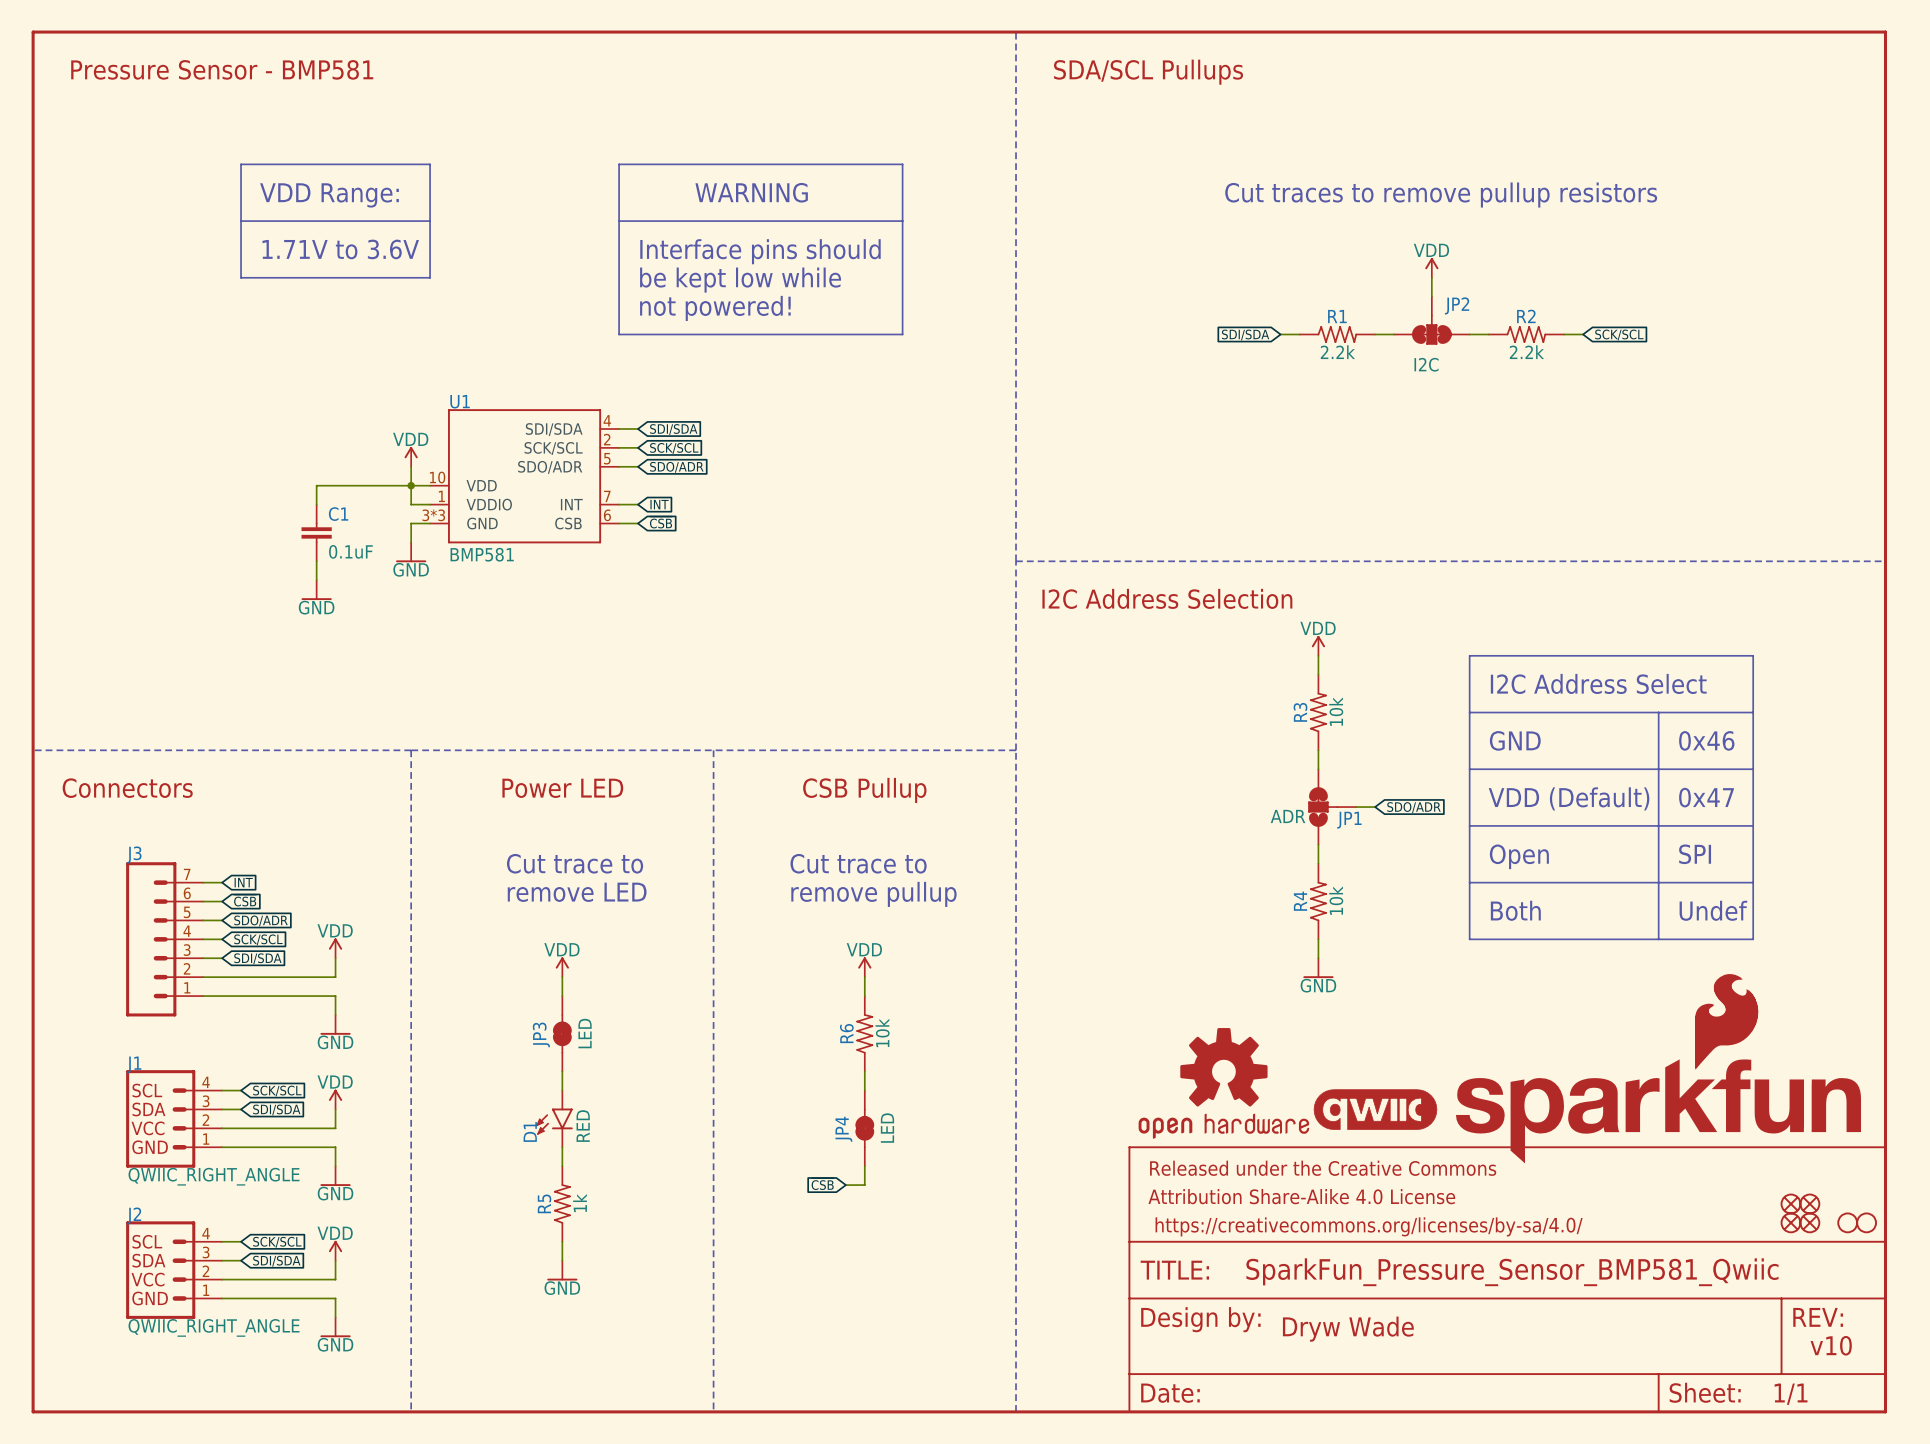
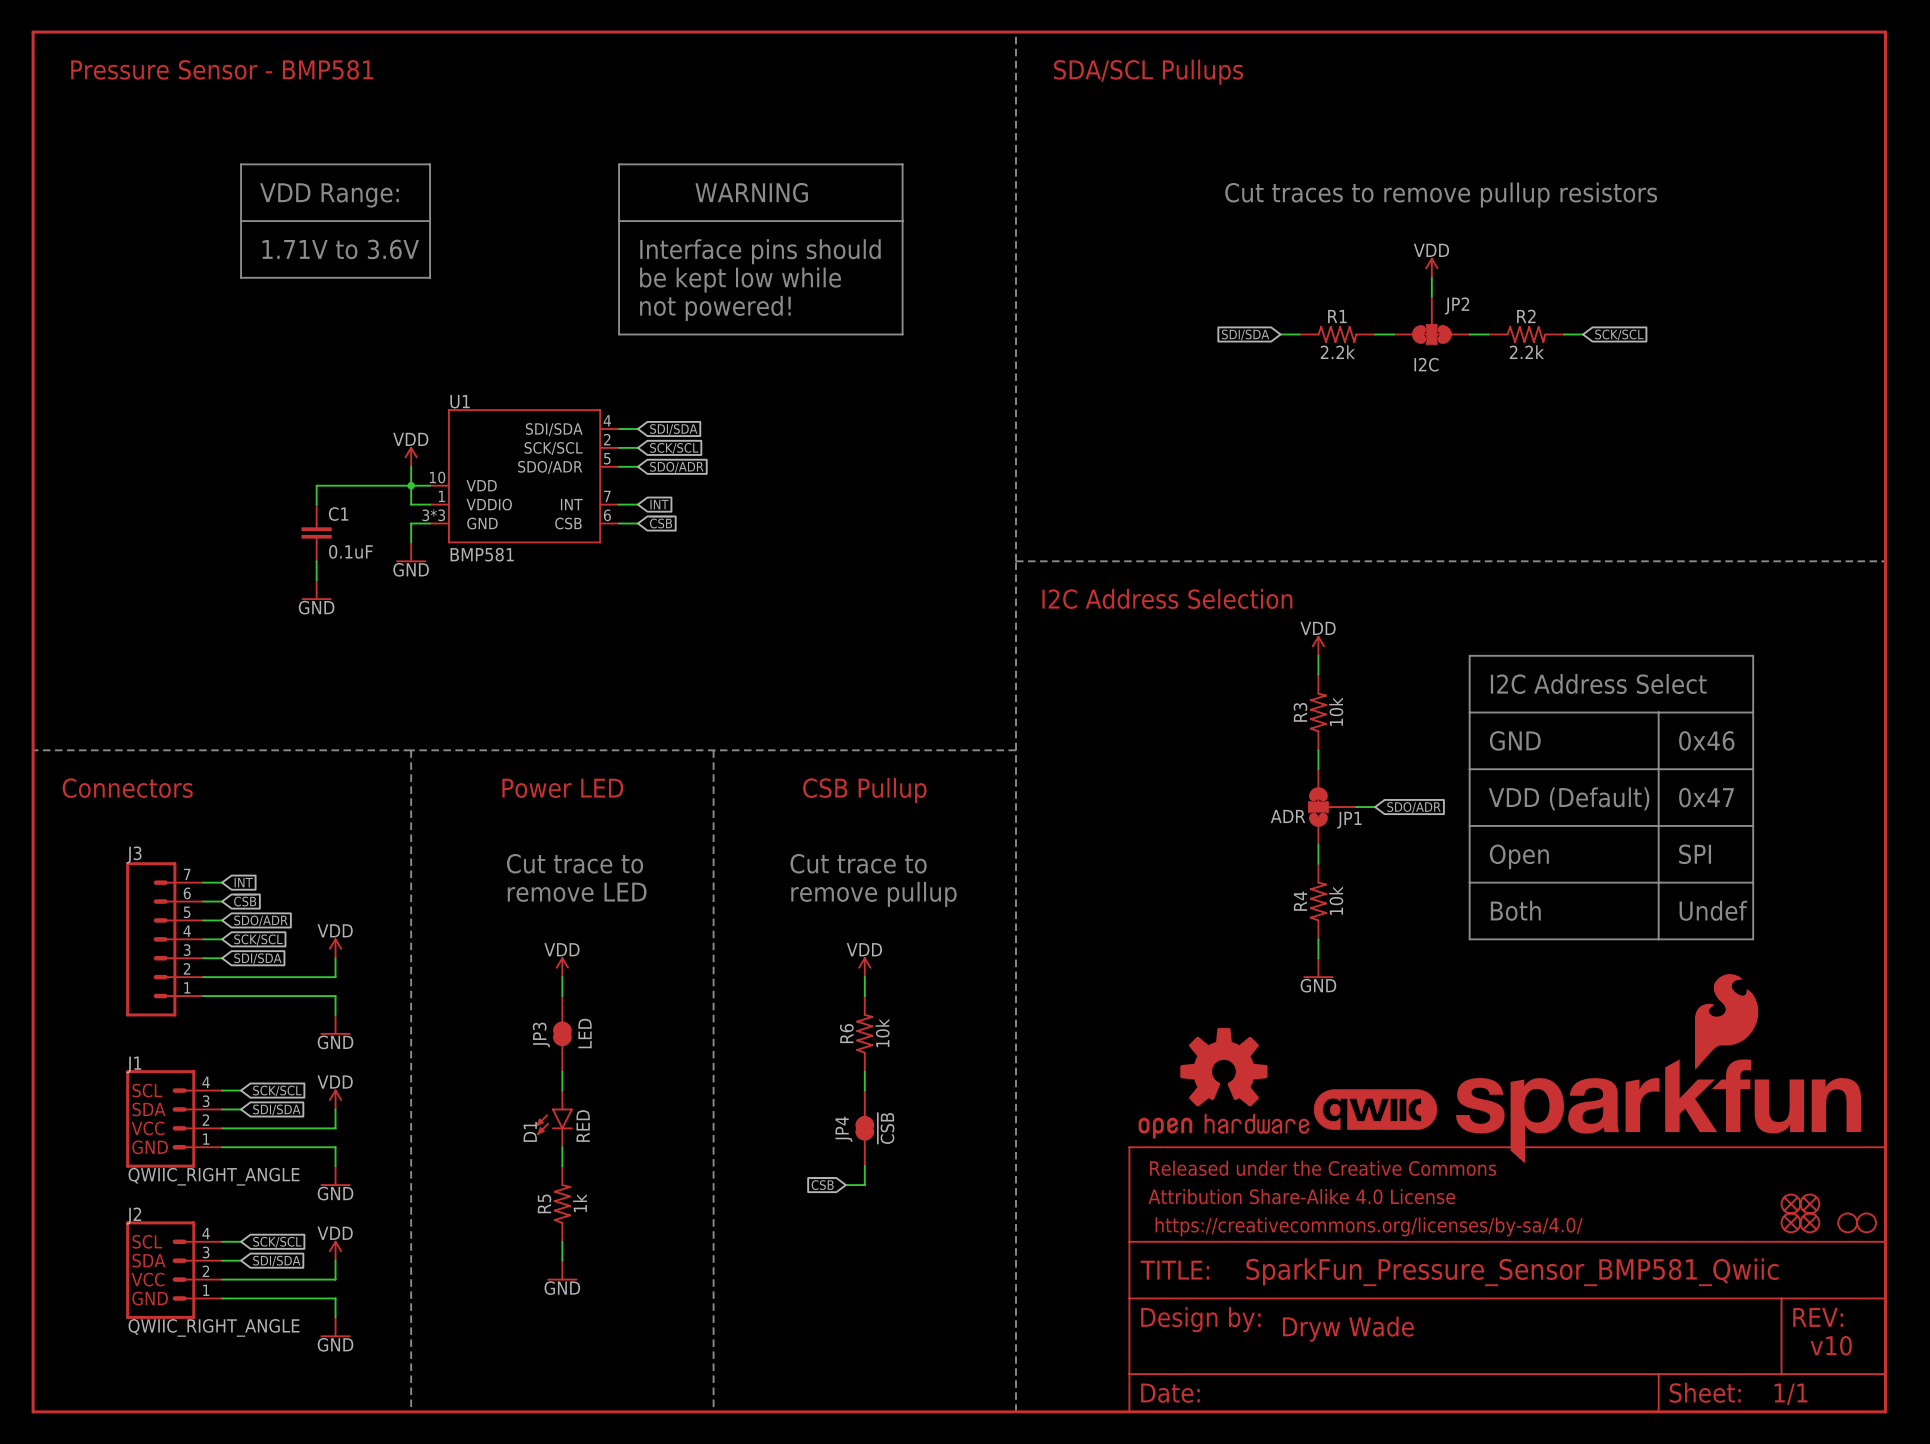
JP4 value: LED (887, 1128) -> ~{CSB} (886, 1128)

